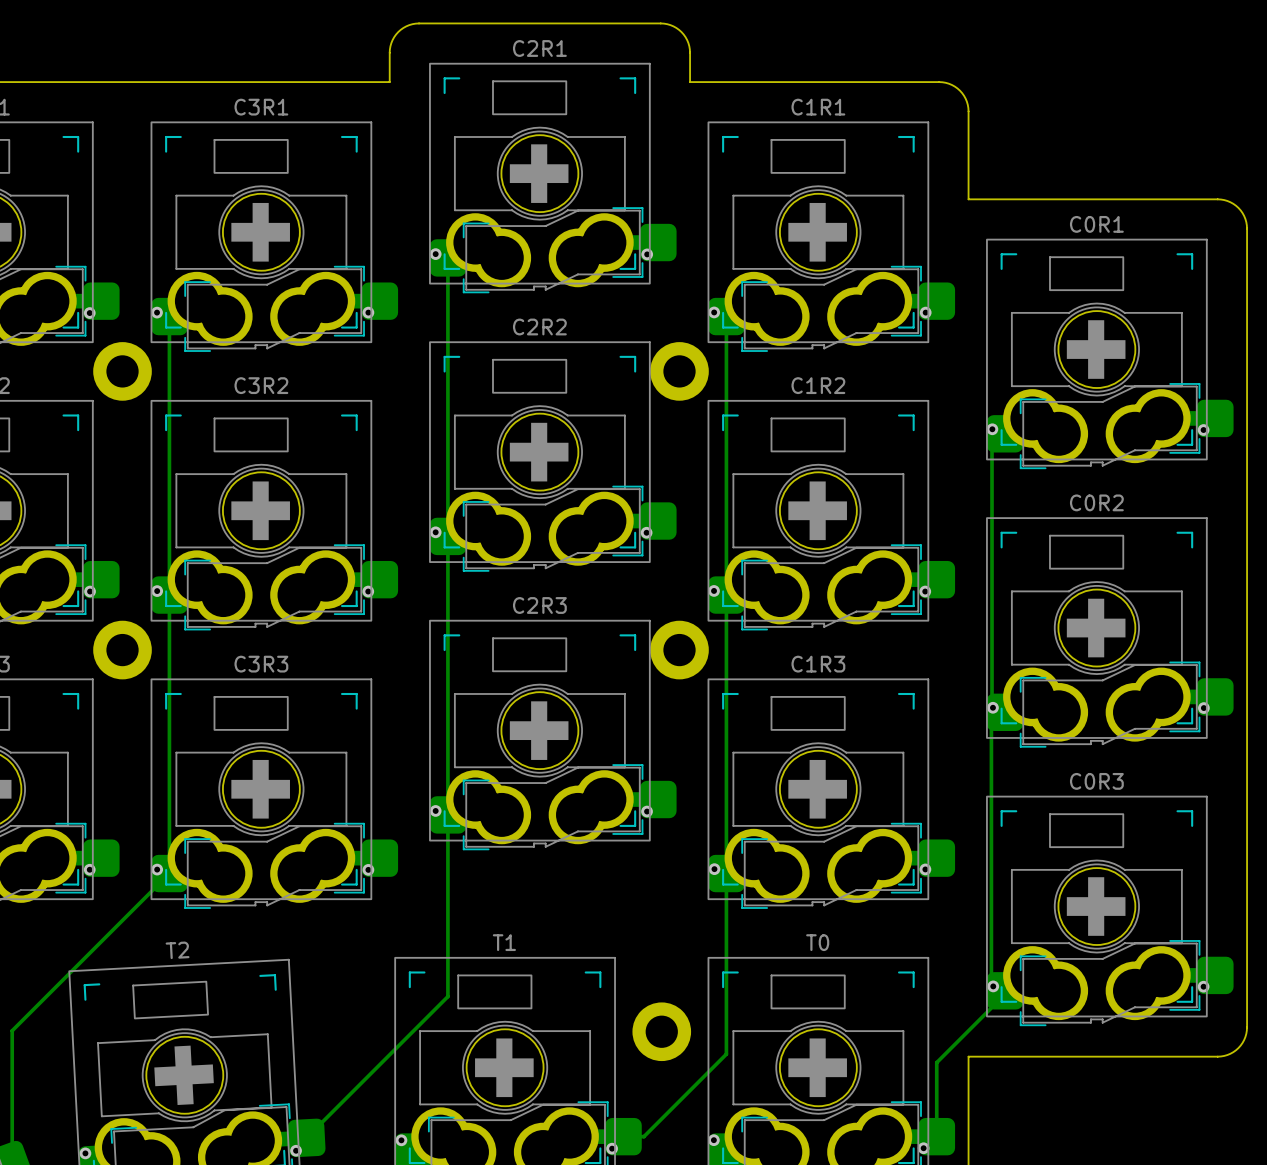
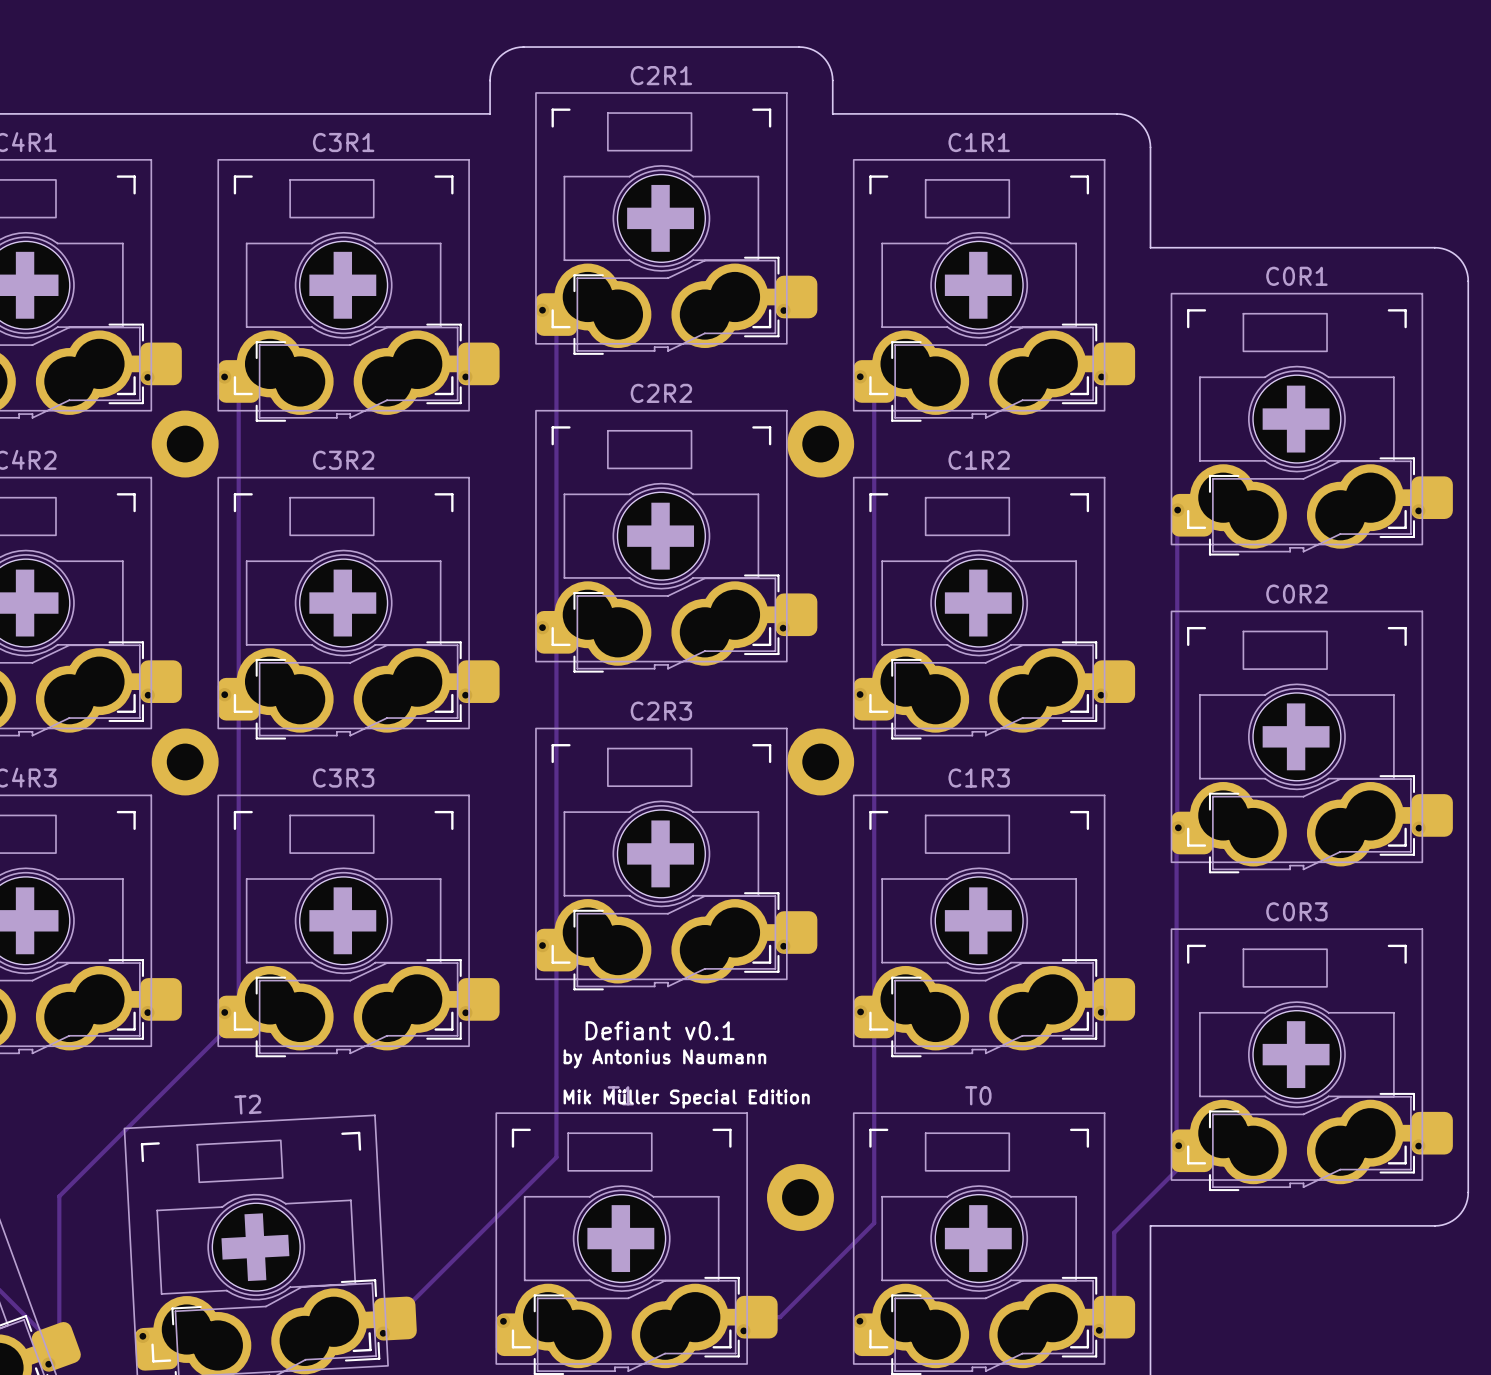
text: none -> Defiant v0.1 (660, 1030)
text: none -> by Antonius Naumann (664, 1058)
text: none -> Mik Müller Special Edition (686, 1099)

